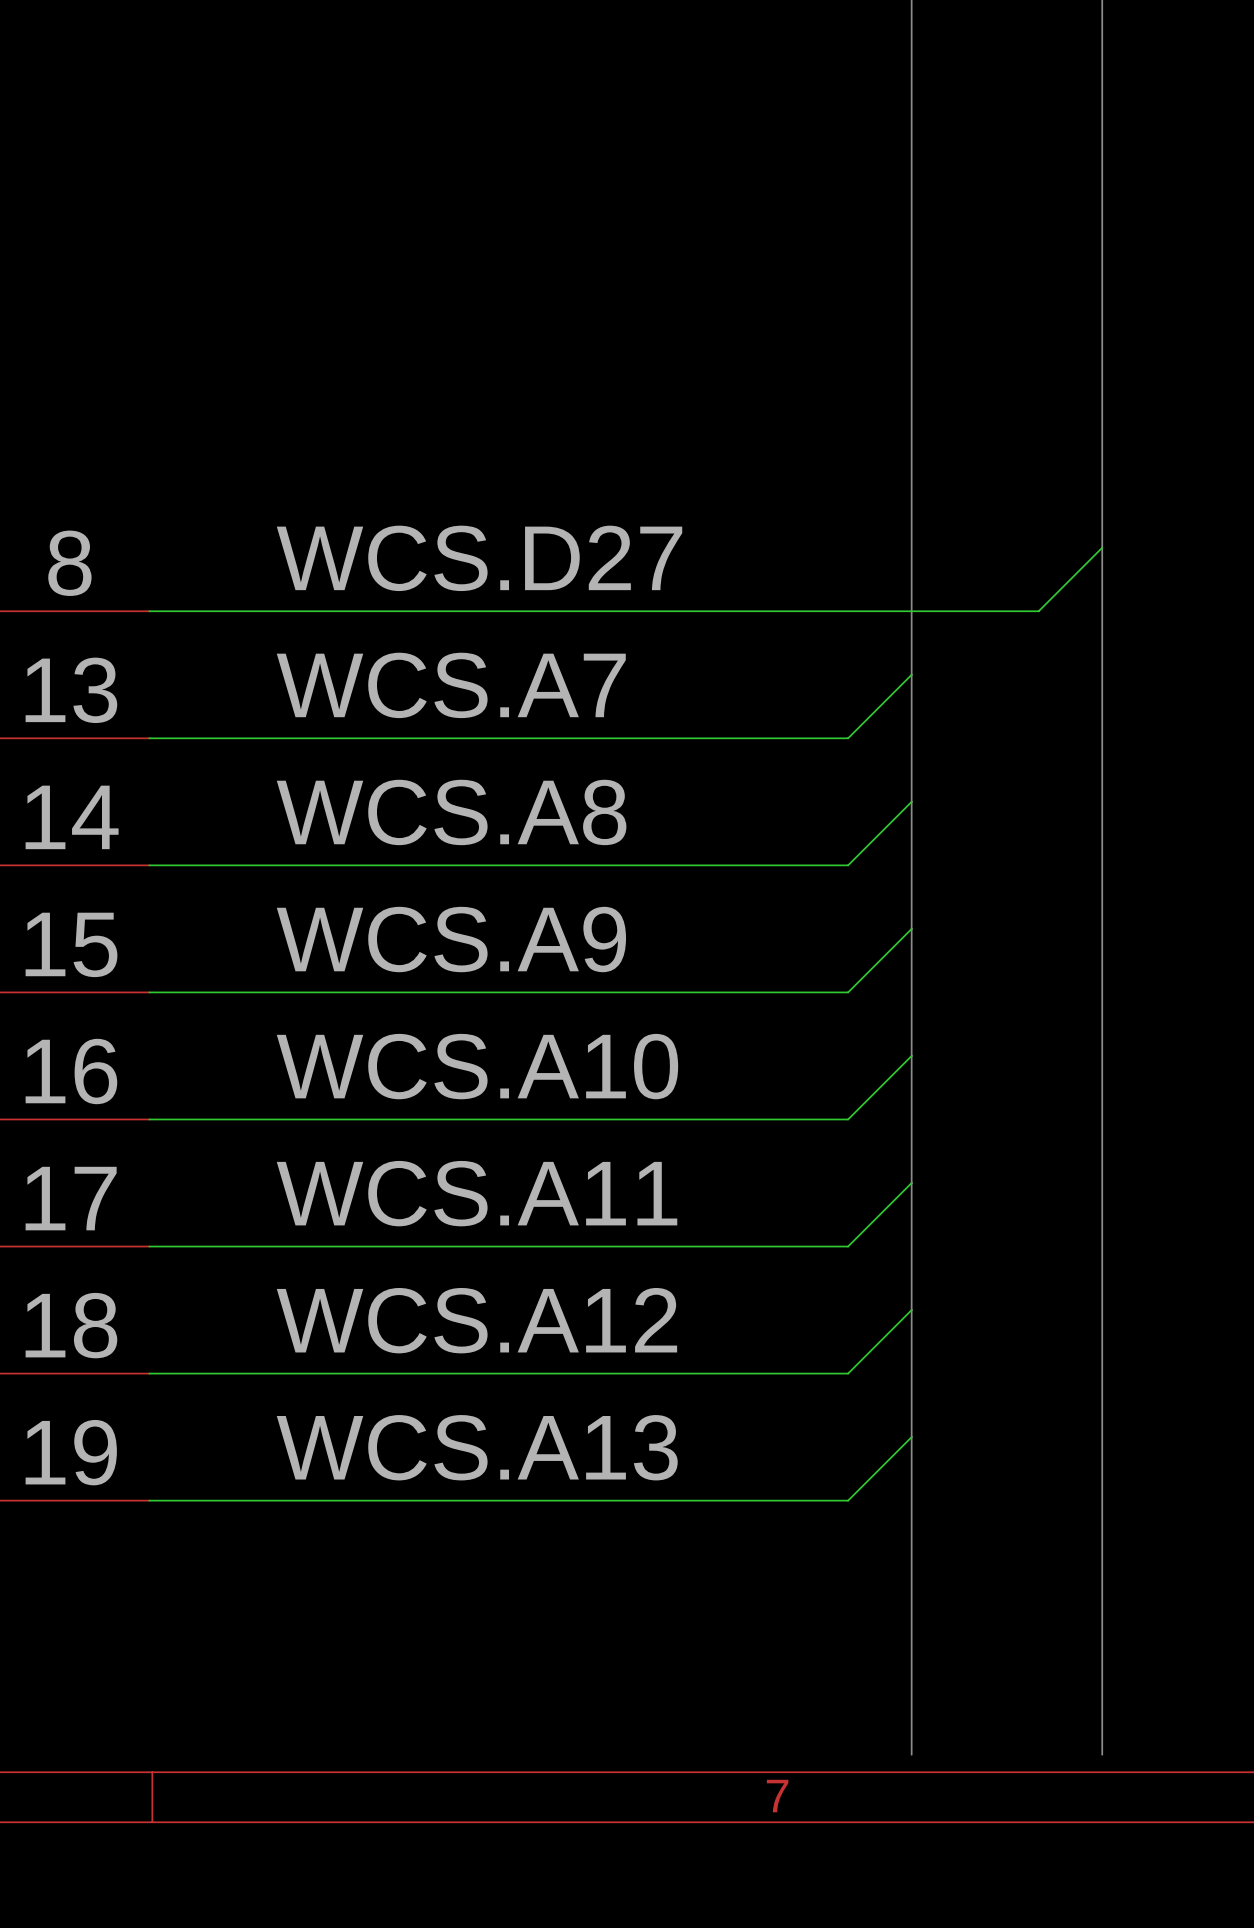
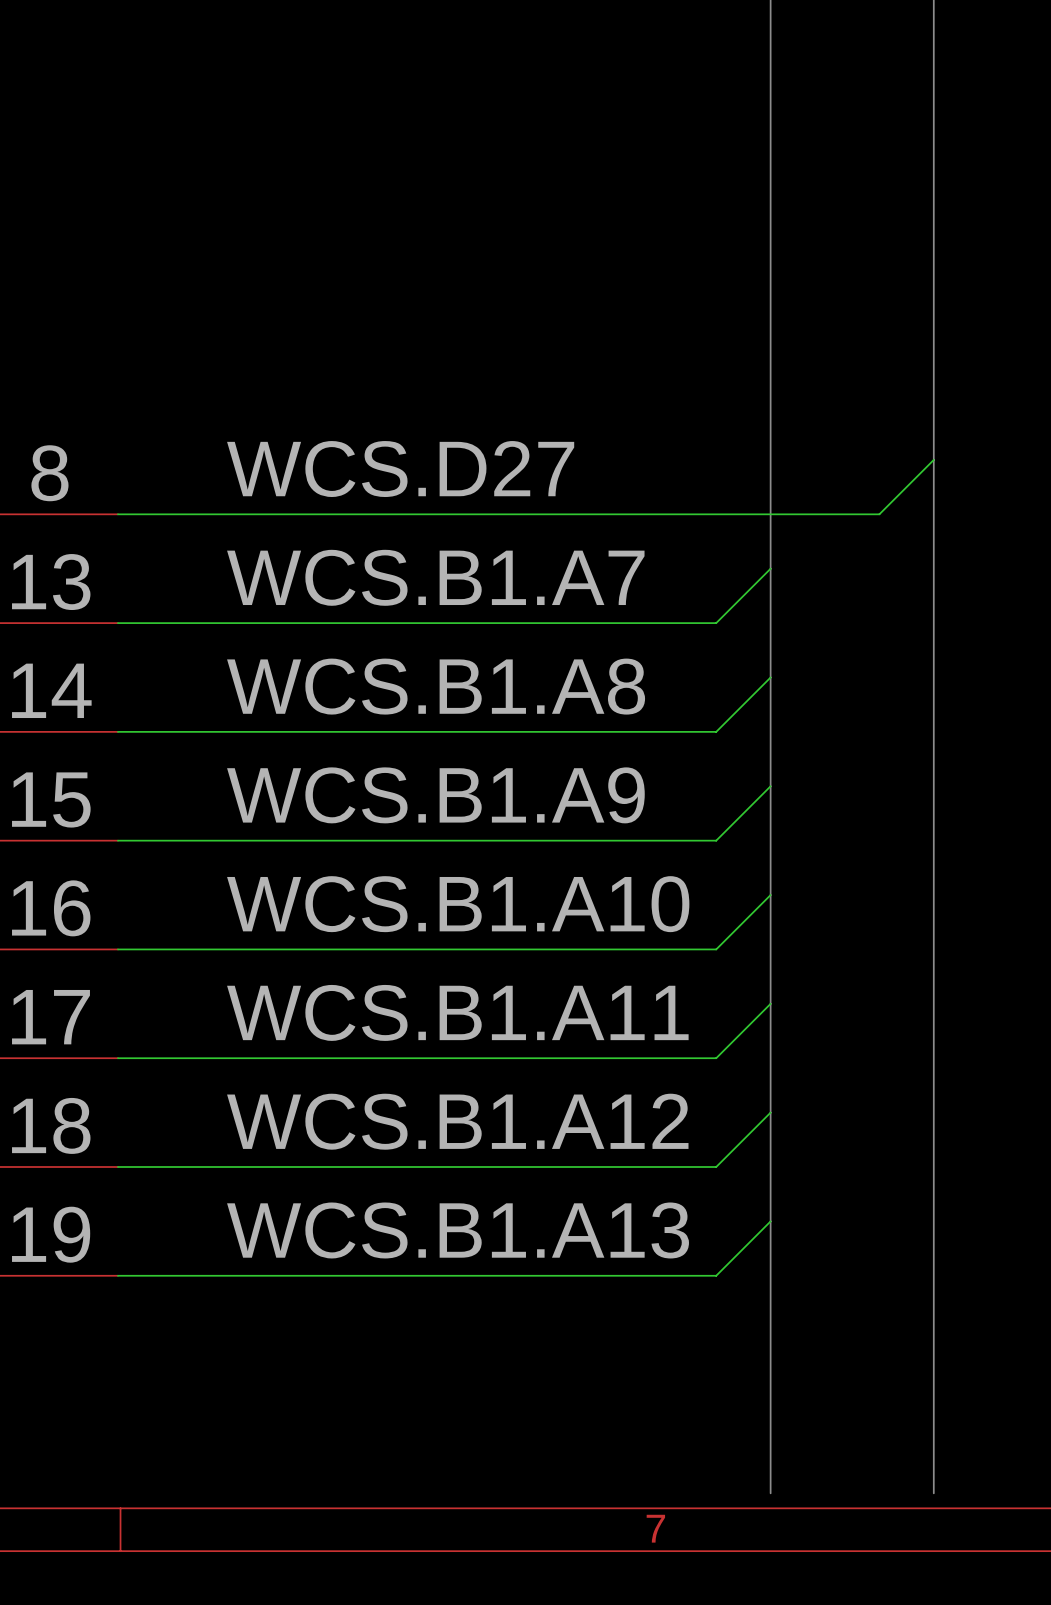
label: WCS.A7 (451, 685) -> WCS.B1.A7 (435, 577)
label: WCS.A8 (451, 812) -> WCS.B1.A8 (436, 686)
label: WCS.A9 (451, 939) -> WCS.B1.A9 (435, 795)
label: WCS.A10 (477, 1066) -> WCS.B1.A10 (458, 904)
label: WCS.A11 (477, 1193) -> WCS.B1.A11 (457, 1012)
label: WCS.A12 (476, 1320) -> WCS.B1.A12 (457, 1121)
label: WCS.A13 (477, 1447) -> WCS.B1.A13 (458, 1230)

